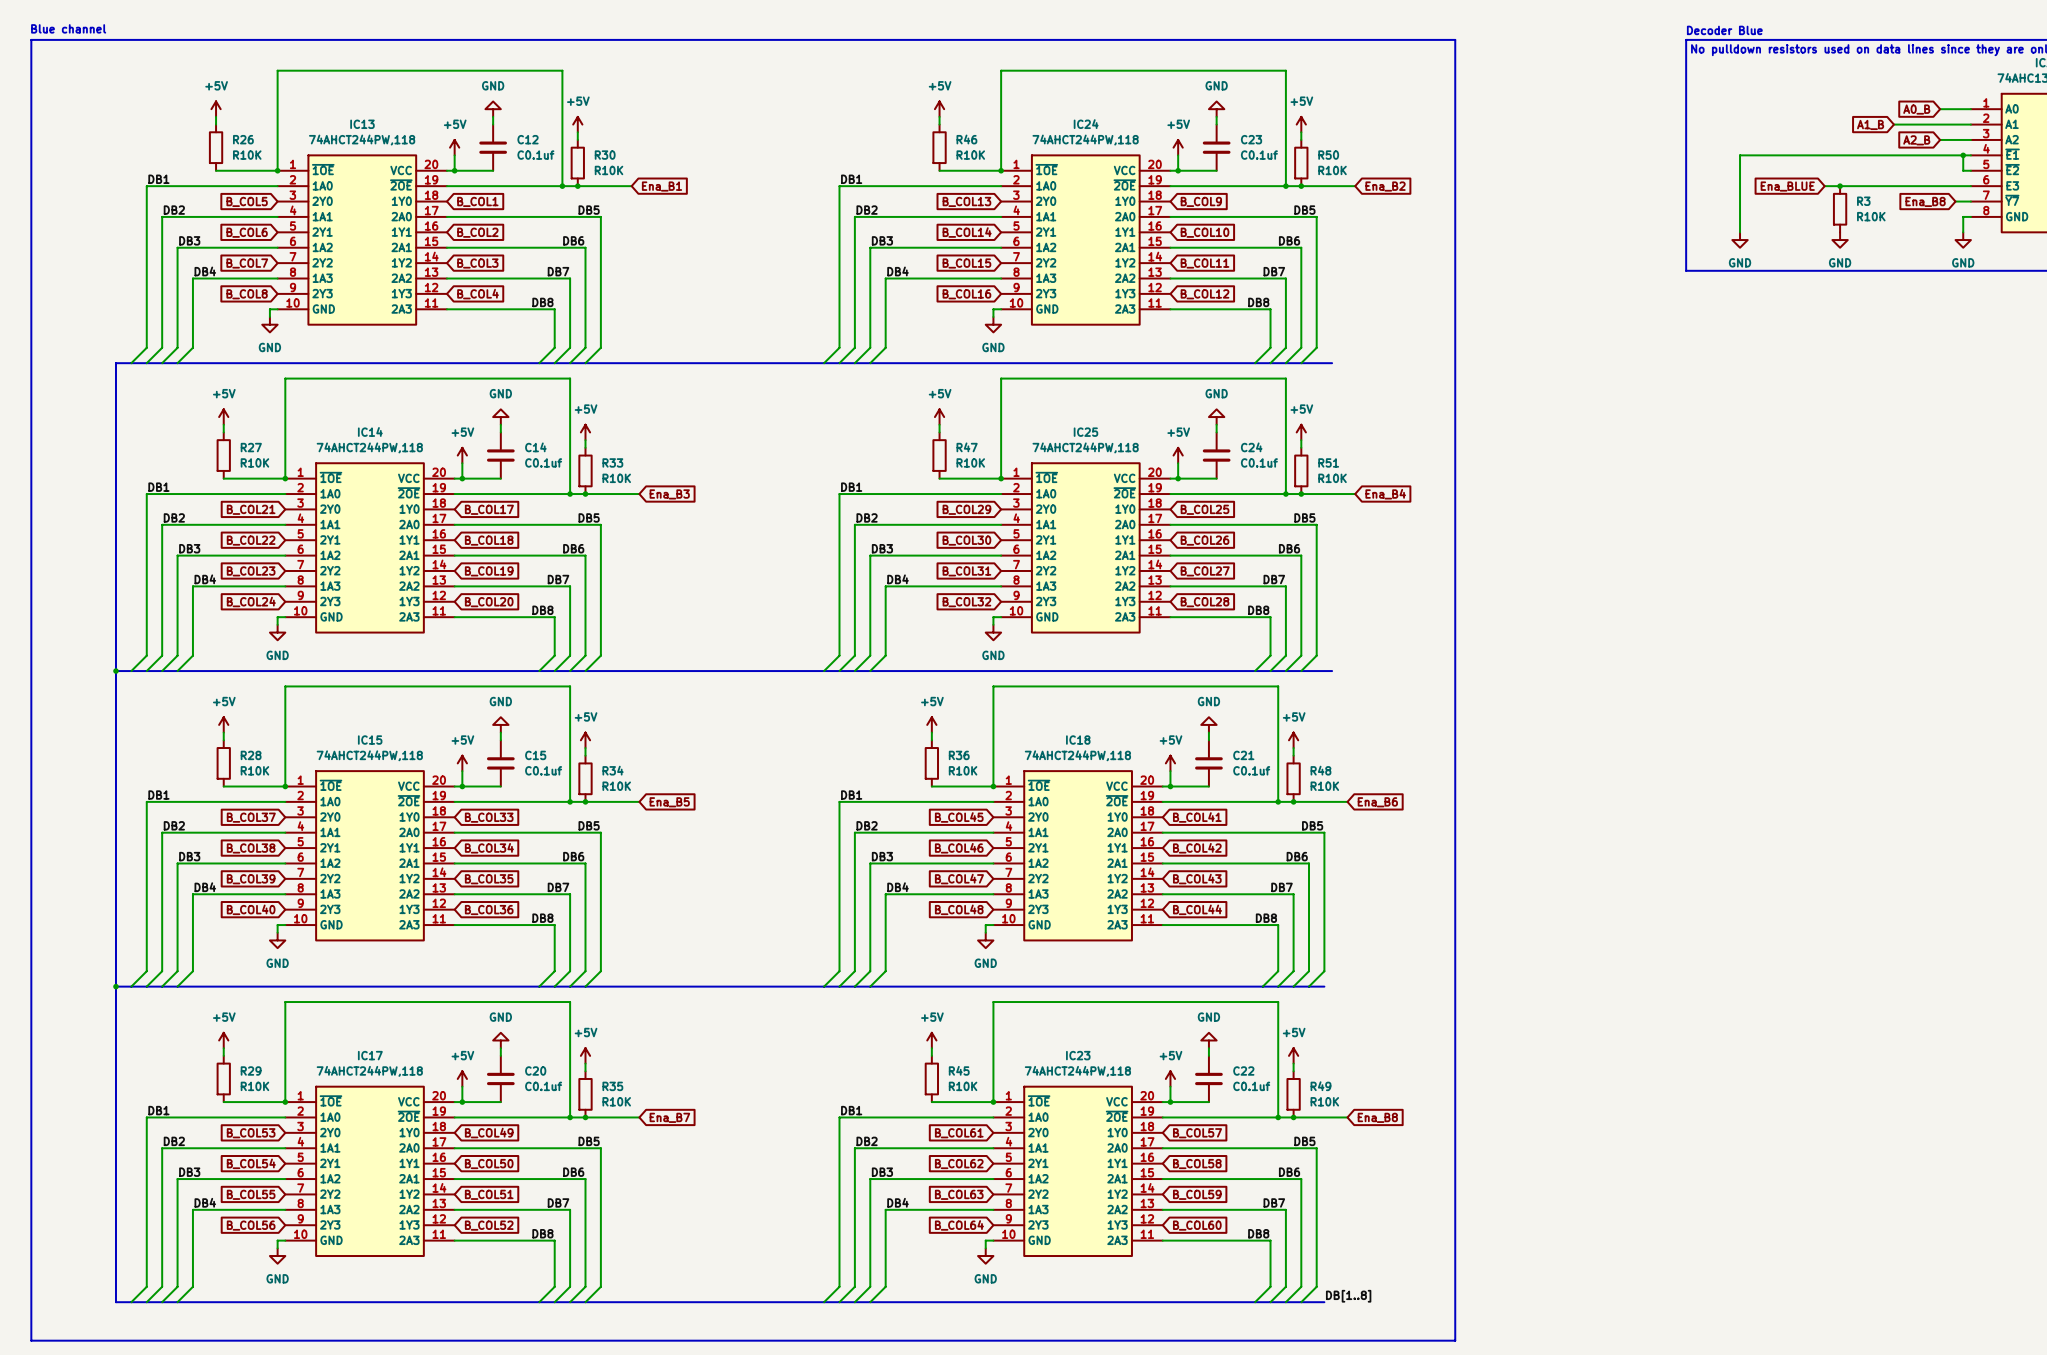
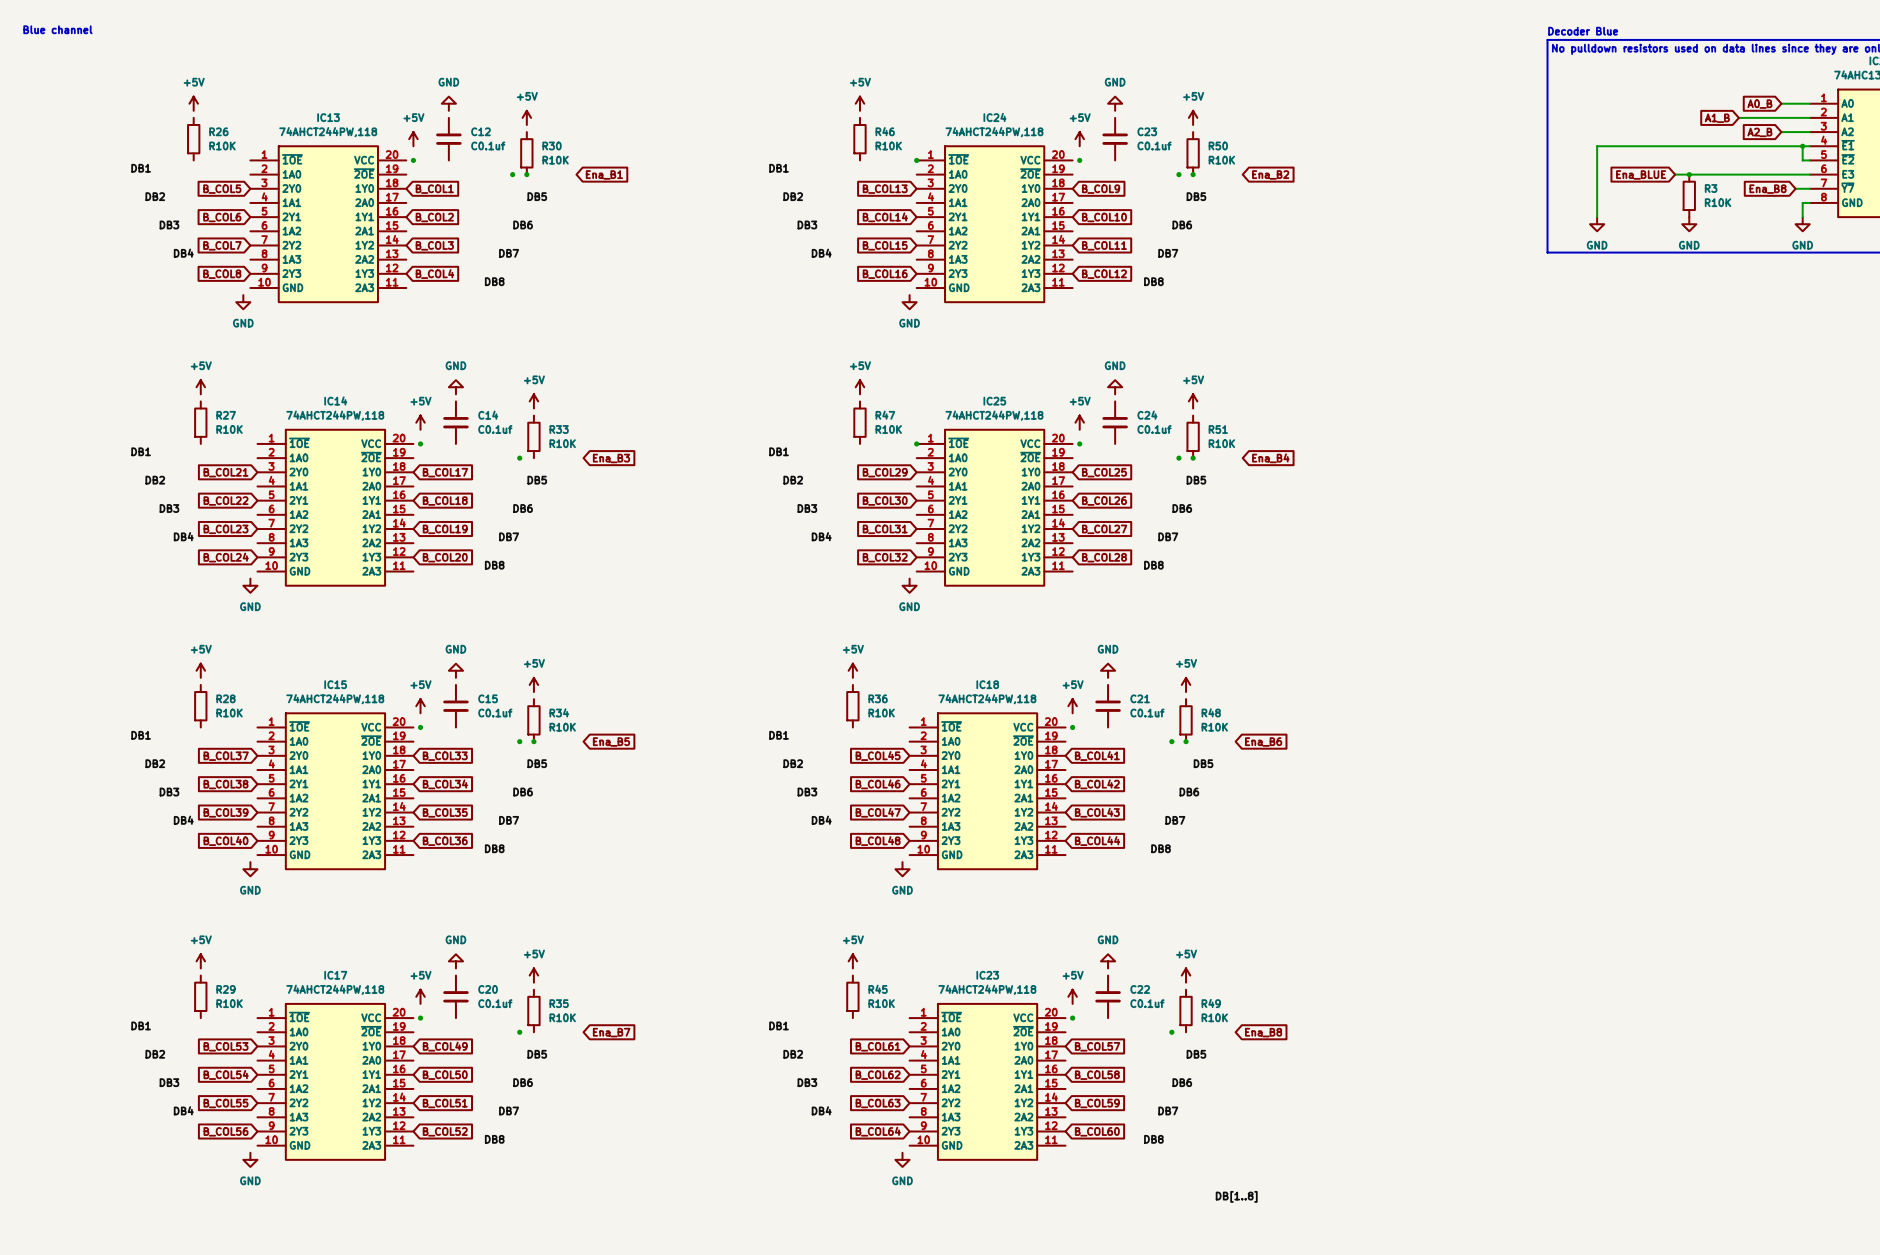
line: (31, 39) (1455, 39) (1455, 1340) (31, 1340) (31, 39) -> none
wire: (216, 116) (216, 124) -> none
wire: (493, 116) (493, 124) -> none
wire: (939, 116) (939, 124) -> none
wire: (1216, 116) (1216, 124) -> none
wire: (577, 132) (577, 139) -> none
wire: (1301, 132) (1301, 139) -> none
wire: (454, 155) (454, 170) -> none
wire: (1178, 155) (1178, 170) -> none
wire: (216, 170) (277, 170) (277, 70) (562, 70) (562, 186) -> none
junction: (277, 170) -> none
wire: (446, 170) (493, 170) -> none
wire: (939, 170) (1001, 170) (1001, 70) (1285, 70) (1285, 186) -> none
wire: (1170, 170) (1216, 170) -> none
wire: (277, 186) (146, 186) (146, 347) (131, 363) -> none
wire: (446, 186) (631, 186) -> none
wire: (1001, 186) (839, 186) (839, 347) (824, 363) -> none
wire: (1170, 186) (1355, 186) -> none
wire: (277, 216) (162, 216) (162, 347) (146, 363) -> none
wire: (446, 216) (600, 216) (600, 347) (585, 363) -> none
wire: (1001, 216) (854, 216) (854, 347) (839, 363) -> none
wire: (1170, 216) (1316, 216) (1316, 347) (1301, 363) -> none
wire: (277, 247) (177, 247) (177, 347) (162, 363) -> none
wire: (446, 247) (585, 247) (585, 347) (570, 363) -> none
wire: (1001, 247) (870, 247) (870, 347) (854, 363) -> none
wire: (1170, 247) (1301, 247) (1301, 347) (1285, 363) -> none
wire: (277, 278) (192, 278) (192, 347) (177, 363) -> none
wire: (446, 278) (570, 278) (570, 347) (554, 363) -> none
wire: (1001, 278) (885, 278) (885, 347) (870, 363) -> none
wire: (1170, 278) (1285, 278) (1285, 347) (1270, 363) -> none
wire: (277, 309) (269, 309) (269, 316) -> none
wire: (446, 309) (554, 309) (554, 347) (539, 363) -> none
wire: (1001, 309) (993, 309) (993, 316) -> none
wire: (1170, 309) (1270, 309) (1270, 347) (1255, 363) -> none
bus: (1332, 363) (115, 363) (115, 1302) (1324, 1302) -> none
wire: (223, 424) (223, 432) -> none
wire: (500, 424) (500, 432) -> none
wire: (939, 424) (939, 432) -> none
wire: (1216, 424) (1216, 432) -> none
wire: (585, 440) (585, 447) -> none
wire: (1301, 440) (1301, 447) -> none
wire: (462, 463) (462, 478) -> none
wire: (1178, 463) (1178, 478) -> none
wire: (223, 478) (285, 478) (285, 378) (570, 378) (570, 494) -> none
junction: (285, 478) -> none
wire: (454, 478) (500, 478) -> none
wire: (939, 478) (1001, 478) (1001, 378) (1285, 378) (1285, 494) -> none
wire: (1170, 478) (1216, 478) -> none
wire: (285, 494) (146, 494) (146, 655) (131, 671) -> none
wire: (454, 494) (639, 494) -> none
junction: (585, 494) -> none
wire: (1001, 494) (839, 494) (839, 655) (824, 671) -> none
wire: (1170, 494) (1355, 494) -> none
wire: (285, 524) (162, 524) (162, 655) (146, 671) -> none
wire: (454, 524) (600, 524) (600, 655) (585, 671) -> none
wire: (1001, 524) (854, 524) (854, 655) (839, 671) -> none
wire: (1170, 524) (1316, 524) (1316, 655) (1301, 671) -> none
wire: (285, 555) (177, 555) (177, 655) (162, 671) -> none
wire: (454, 555) (585, 555) (585, 655) (570, 671) -> none
wire: (1001, 555) (870, 555) (870, 655) (854, 671) -> none
wire: (1170, 555) (1301, 555) (1301, 655) (1285, 671) -> none
wire: (285, 586) (192, 586) (192, 655) (177, 671) -> none
wire: (454, 586) (570, 586) (570, 655) (554, 671) -> none
wire: (1001, 586) (885, 586) (885, 655) (870, 671) -> none
wire: (1170, 586) (1285, 586) (1285, 655) (1270, 671) -> none
wire: (285, 617) (277, 617) (277, 624) -> none
wire: (454, 617) (554, 617) (554, 655) (539, 671) -> none
wire: (1001, 617) (993, 617) (993, 624) -> none
wire: (1170, 617) (1270, 617) (1270, 655) (1255, 671) -> none
bus: (115, 671) (1332, 671) -> none
junction: (115, 671) -> none
wire: (223, 732) (223, 740) -> none
wire: (500, 732) (500, 740) -> none
wire: (931, 732) (931, 740) -> none
wire: (1208, 732) (1208, 740) -> none
wire: (585, 748) (585, 755) -> none
wire: (1293, 748) (1293, 755) -> none
wire: (462, 771) (462, 786) -> none
wire: (1170, 771) (1170, 786) -> none
wire: (223, 786) (285, 786) (285, 686) (570, 686) (570, 801) -> none
junction: (285, 786) -> none
wire: (454, 786) (500, 786) -> none
wire: (931, 786) (993, 786) (993, 686) (1278, 686) (1278, 801) -> none
junction: (993, 786) -> none
wire: (1162, 786) (1208, 786) -> none
wire: (285, 801) (146, 801) (146, 971) (131, 986) -> none
wire: (454, 801) (639, 801) -> none
wire: (993, 801) (839, 801) (839, 971) (824, 986) -> none
wire: (1162, 801) (1347, 801) -> none
wire: (285, 832) (162, 832) (162, 971) (146, 986) -> none
wire: (454, 832) (600, 832) (600, 971) (585, 986) -> none
wire: (993, 832) (854, 832) (854, 971) (839, 986) -> none
wire: (1162, 832) (1324, 832) (1324, 971) (1309, 986) -> none
wire: (285, 863) (177, 863) (177, 971) (162, 986) -> none
wire: (454, 863) (585, 863) (585, 971) (570, 986) -> none
wire: (993, 863) (870, 863) (870, 971) (854, 986) -> none
wire: (1162, 863) (1309, 863) (1309, 971) (1293, 986) -> none
wire: (285, 894) (192, 894) (192, 971) (177, 986) -> none
wire: (454, 894) (570, 894) (570, 971) (554, 986) -> none
wire: (993, 894) (885, 894) (885, 971) (870, 986) -> none
wire: (1162, 894) (1293, 894) (1293, 971) (1278, 986) -> none
wire: (285, 925) (277, 925) (277, 932) -> none
wire: (454, 925) (554, 925) (554, 971) (539, 986) -> none
wire: (993, 925) (985, 925) (985, 932) -> none
wire: (1162, 925) (1278, 925) (1278, 971) (1262, 986) -> none
bus: (115, 986) (1324, 986) -> none
junction: (115, 986) -> none
wire: (223, 1048) (223, 1055) -> none
wire: (500, 1048) (500, 1055) -> none
wire: (931, 1048) (931, 1055) -> none
wire: (1208, 1048) (1208, 1055) -> none
wire: (585, 1063) (585, 1071) -> none
wire: (1293, 1063) (1293, 1071) -> none
wire: (462, 1086) (462, 1102) -> none
wire: (1170, 1086) (1170, 1102) -> none
wire: (223, 1102) (285, 1102) (285, 1002) (570, 1002) (570, 1117) -> none
junction: (285, 1102) -> none
wire: (454, 1102) (500, 1102) -> none
wire: (931, 1102) (993, 1102) (993, 1002) (1278, 1002) (1278, 1117) -> none
junction: (993, 1102) -> none
wire: (1162, 1102) (1208, 1102) -> none
wire: (285, 1117) (146, 1117) (146, 1286) (131, 1302) -> none
wire: (454, 1117) (639, 1117) -> none
junction: (585, 1117) -> none
wire: (993, 1117) (839, 1117) (839, 1286) (824, 1302) -> none
wire: (1162, 1117) (1347, 1117) -> none
junction: (1293, 1117) -> none
wire: (285, 1148) (162, 1148) (162, 1286) (146, 1302) -> none
wire: (454, 1148) (600, 1148) (600, 1286) (585, 1302) -> none
wire: (993, 1148) (854, 1148) (854, 1286) (839, 1302) -> none
wire: (1162, 1148) (1316, 1148) (1316, 1286) (1301, 1302) -> none
wire: (285, 1179) (177, 1179) (177, 1286) (162, 1302) -> none
wire: (454, 1179) (585, 1179) (585, 1286) (570, 1302) -> none
wire: (993, 1179) (870, 1179) (870, 1286) (854, 1302) -> none
wire: (1162, 1179) (1301, 1179) (1301, 1286) (1285, 1302) -> none
wire: (285, 1209) (192, 1209) (192, 1286) (177, 1302) -> none
wire: (454, 1209) (570, 1209) (570, 1286) (554, 1302) -> none
wire: (993, 1209) (885, 1209) (885, 1286) (870, 1302) -> none
wire: (1162, 1209) (1285, 1209) (1285, 1286) (1270, 1302) -> none
wire: (285, 1240) (277, 1240) (277, 1248) -> none
wire: (454, 1240) (554, 1240) (554, 1286) (539, 1302) -> none
wire: (993, 1240) (985, 1240) (985, 1248) -> none
wire: (1162, 1240) (1270, 1240) (1270, 1286) (1255, 1302) -> none

